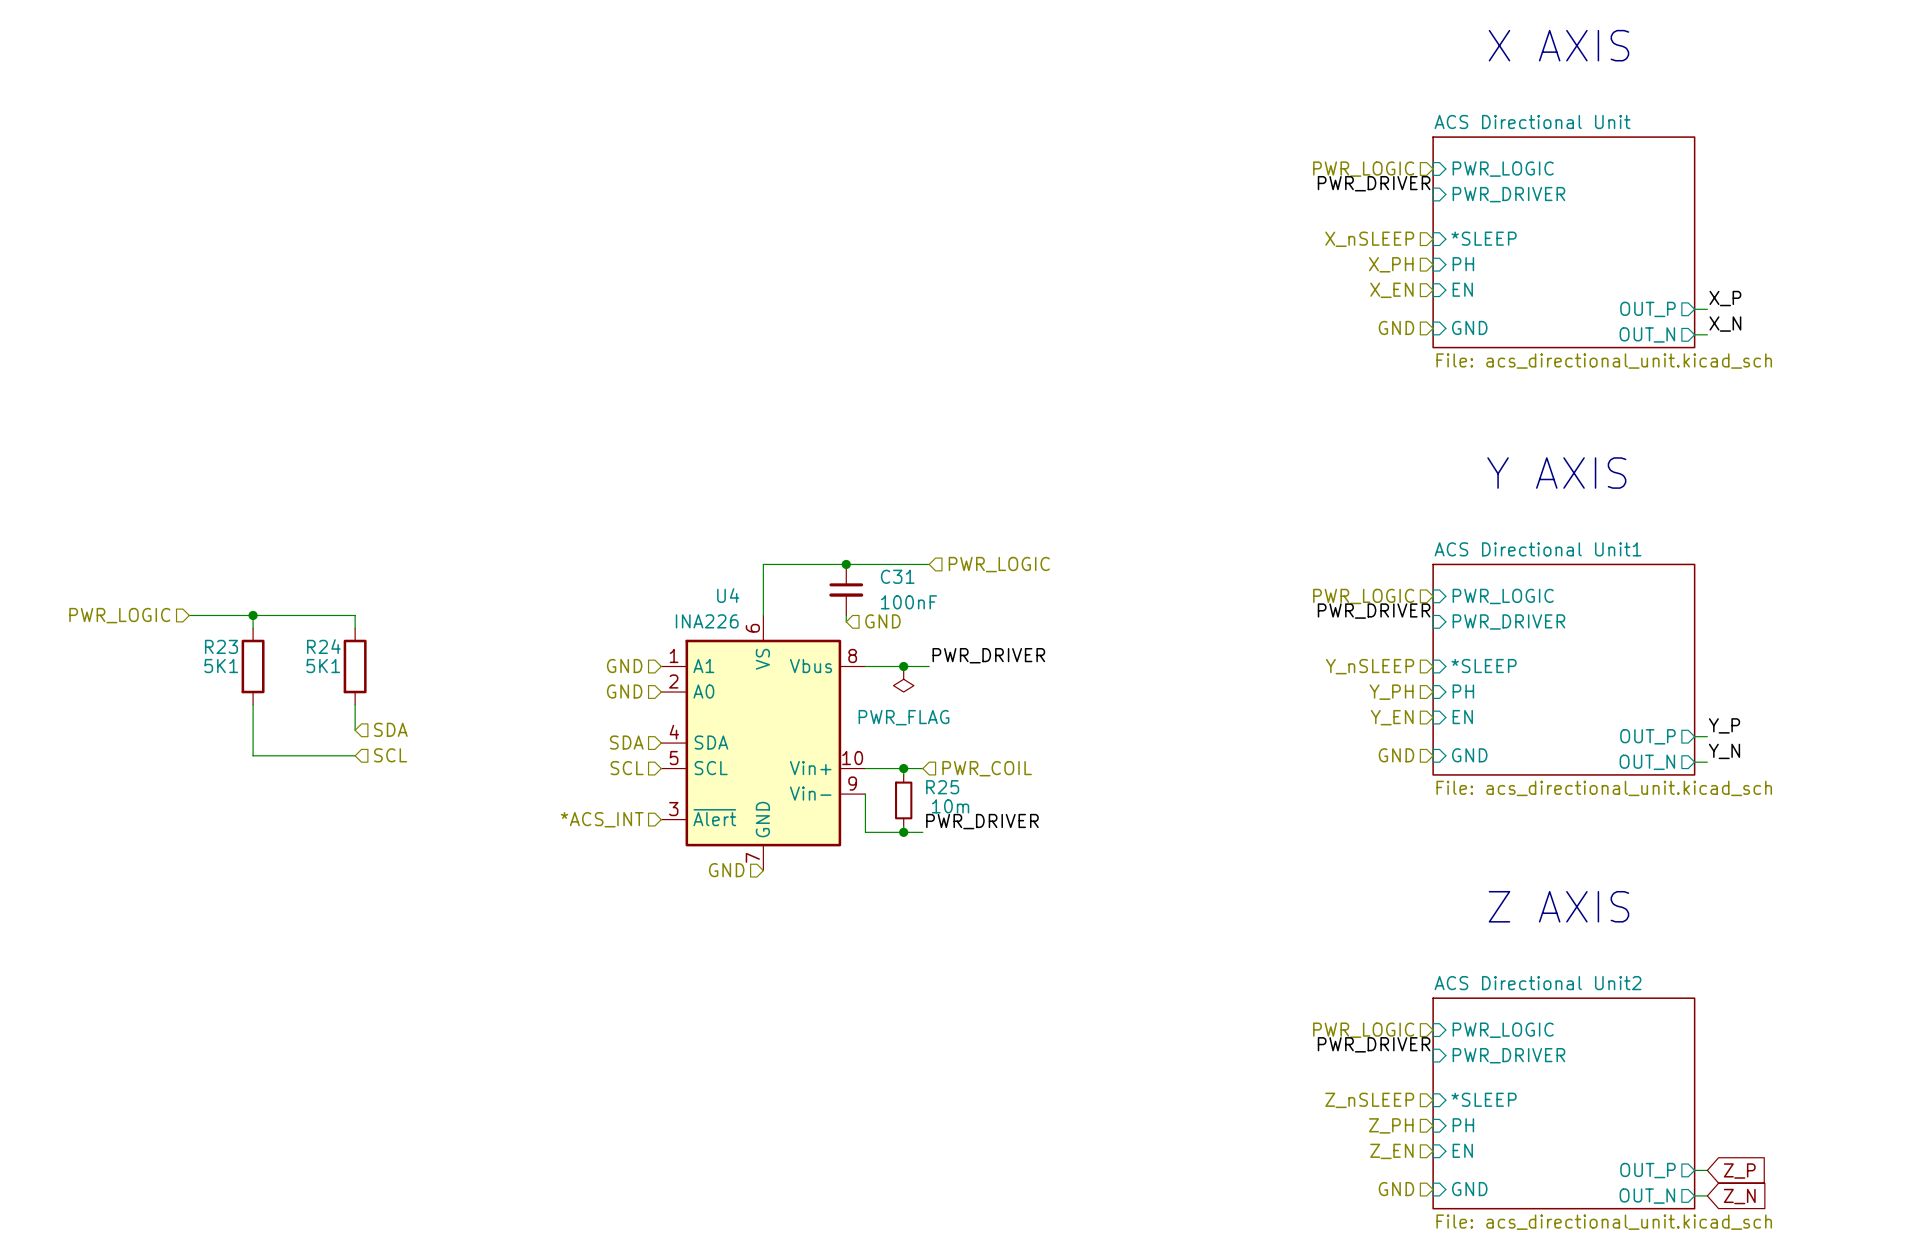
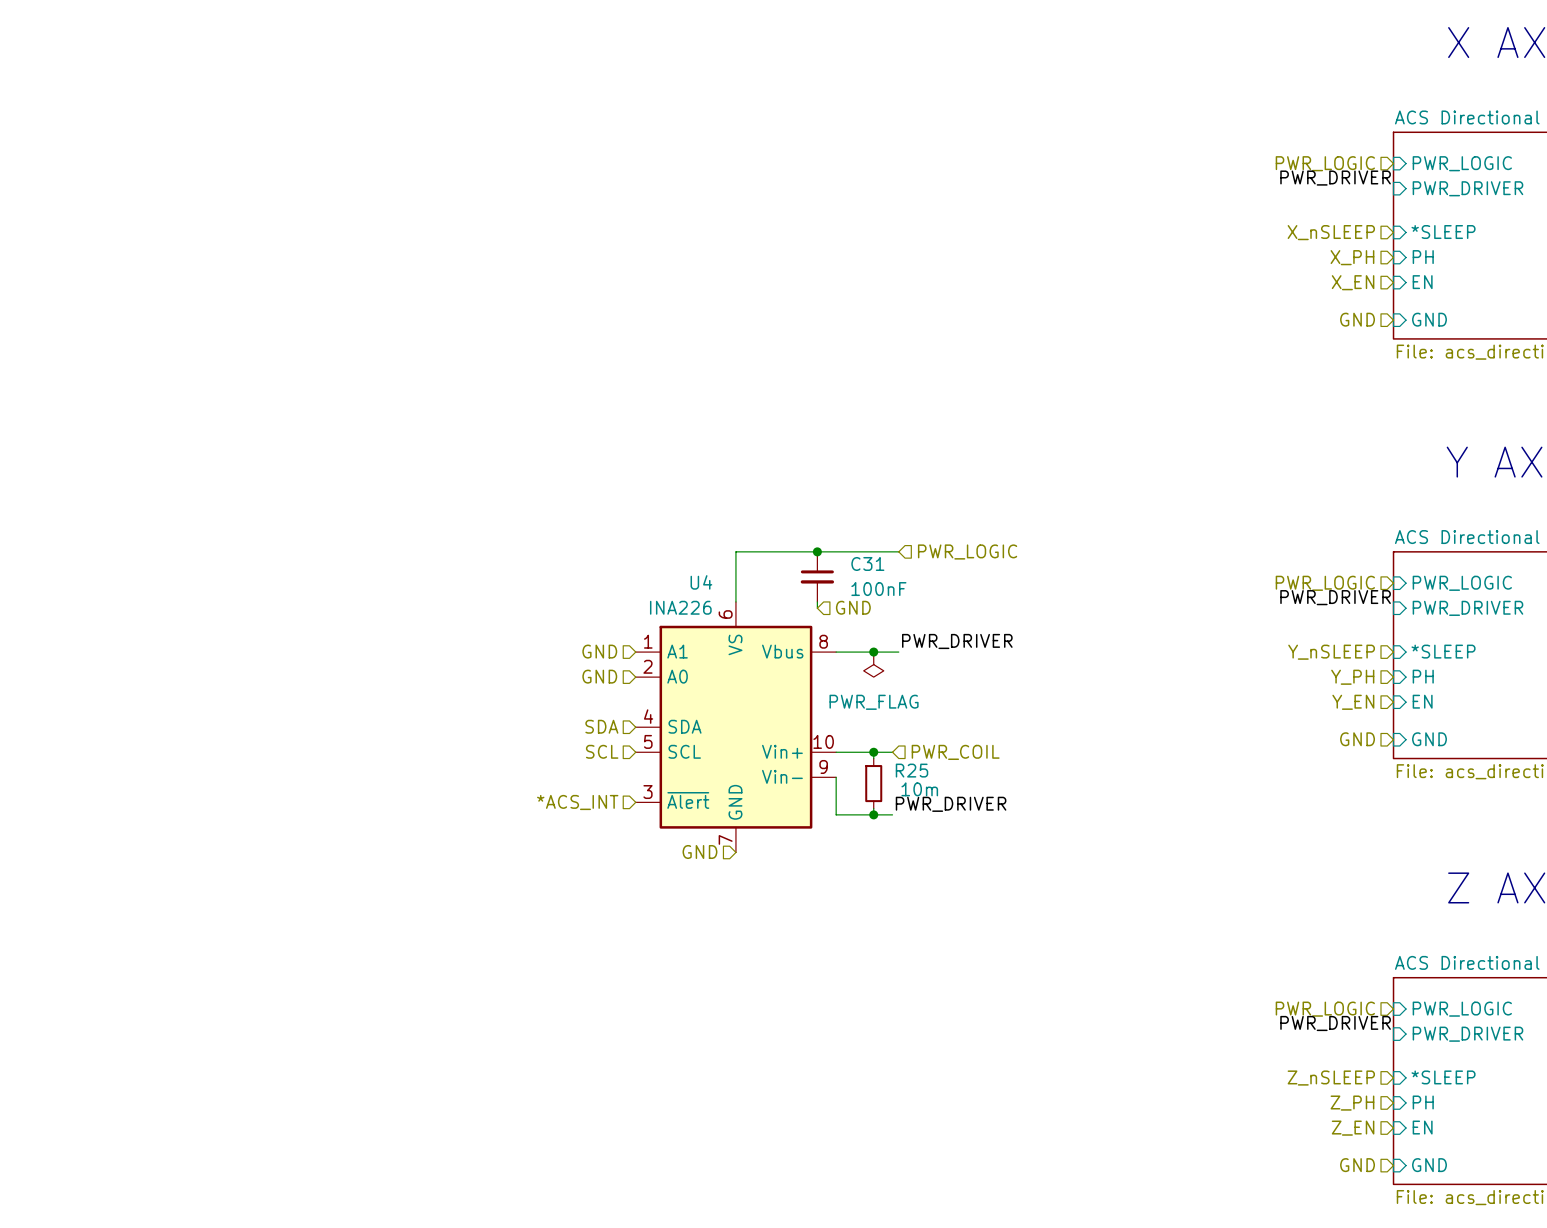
hierarchical label: PWR_LOGIC (119, 615) -> none
wire: (189, 615) (355, 615) (355, 628) -> none
wire: (253, 615) (253, 628) -> none
junction: (253, 615) -> none
R23: 5K1 (253, 666) -> none
R24: 5K1 (355, 666) -> none
wire: (253, 704) (253, 755) (355, 755) -> none
wire: (355, 704) (355, 730) -> none
hierarchical label: SDA (390, 729) -> none
hierarchical label: SCL (390, 755) -> none

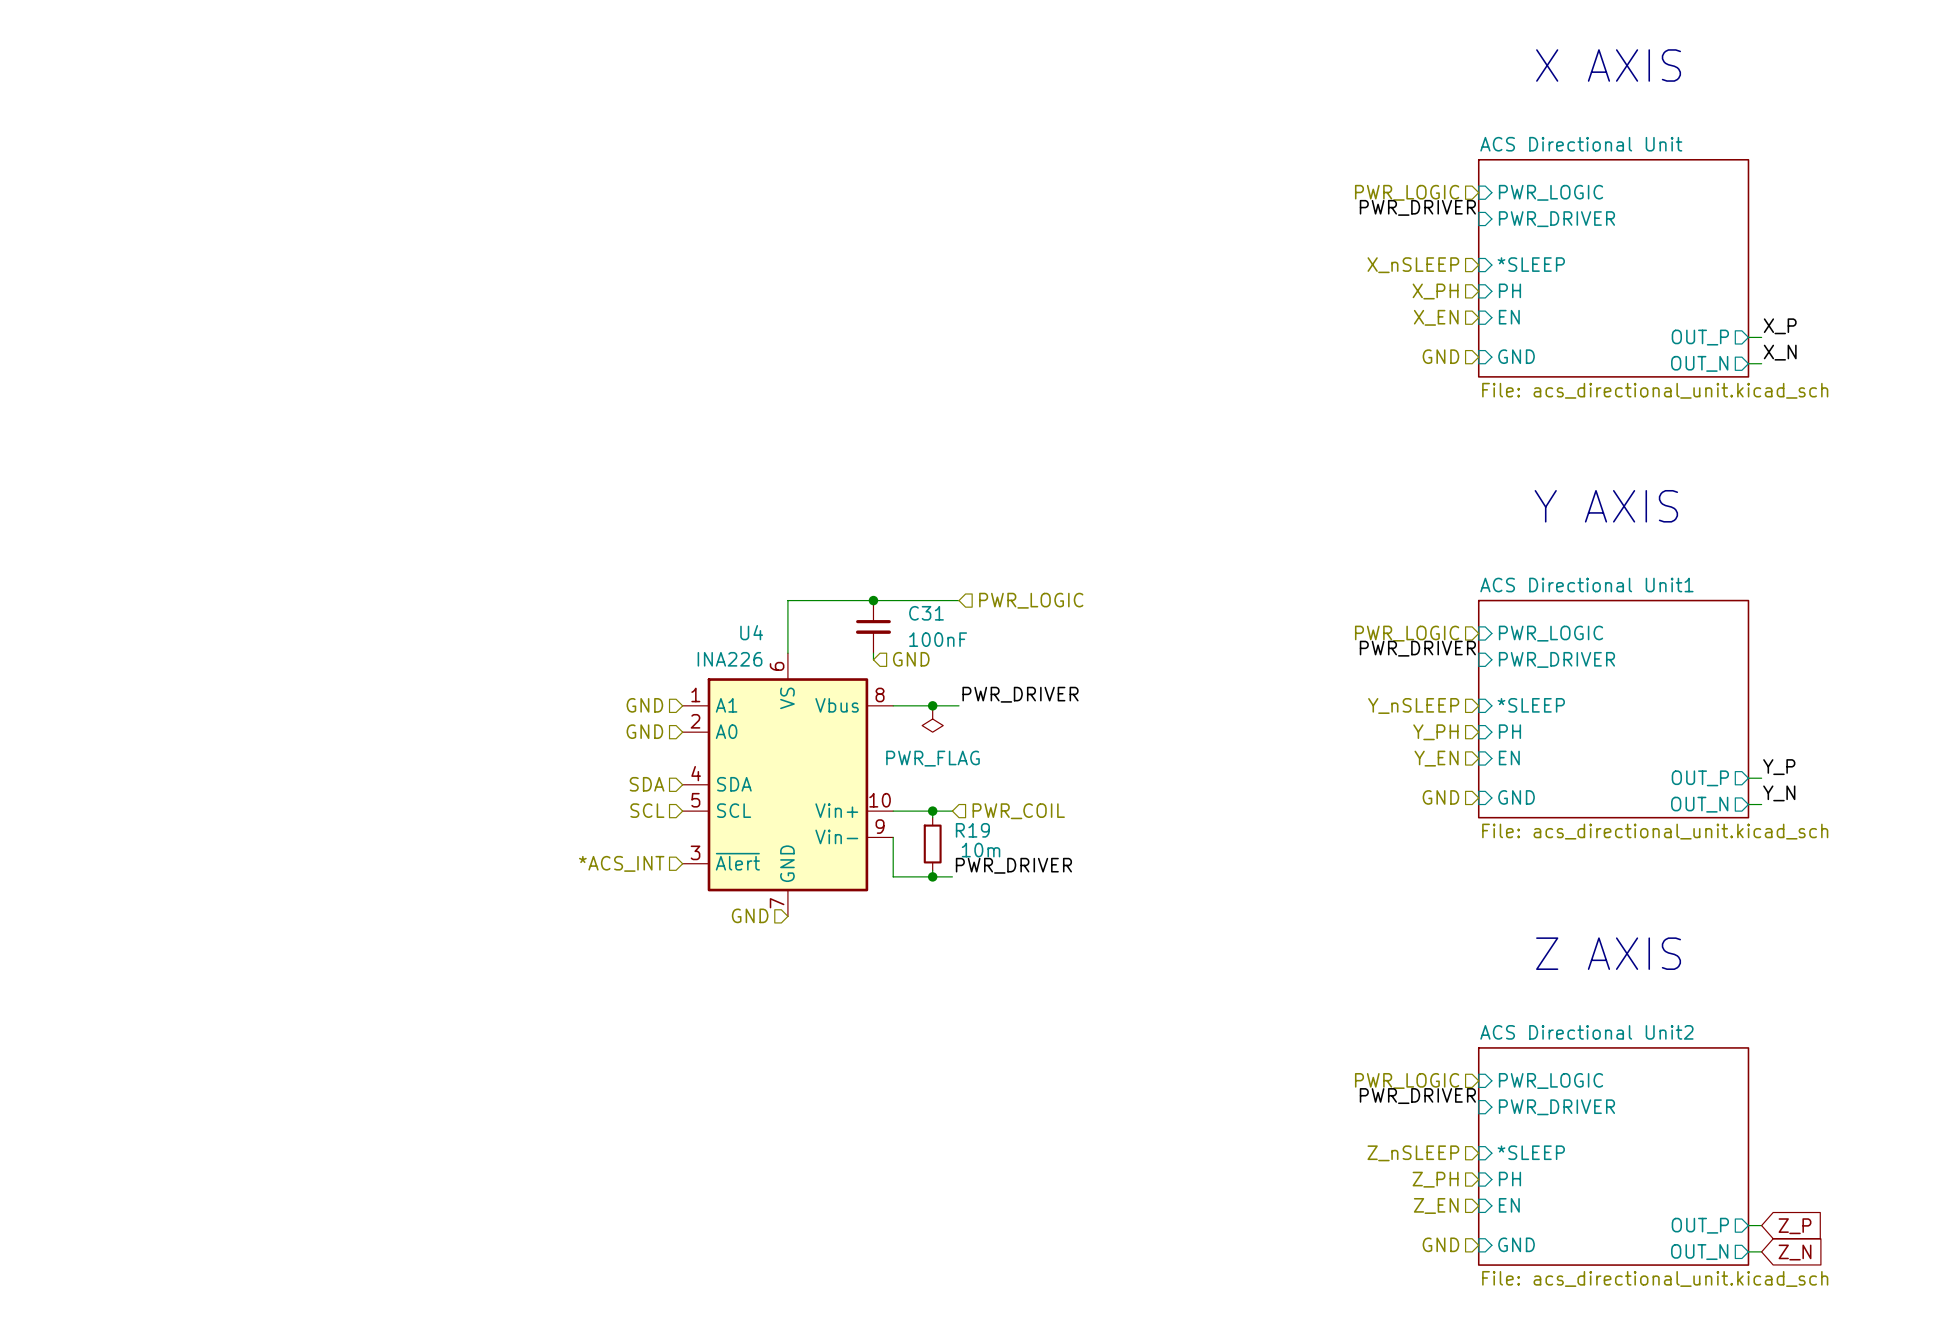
R25 name: R25 (912, 770) -> R19 (972, 830)

